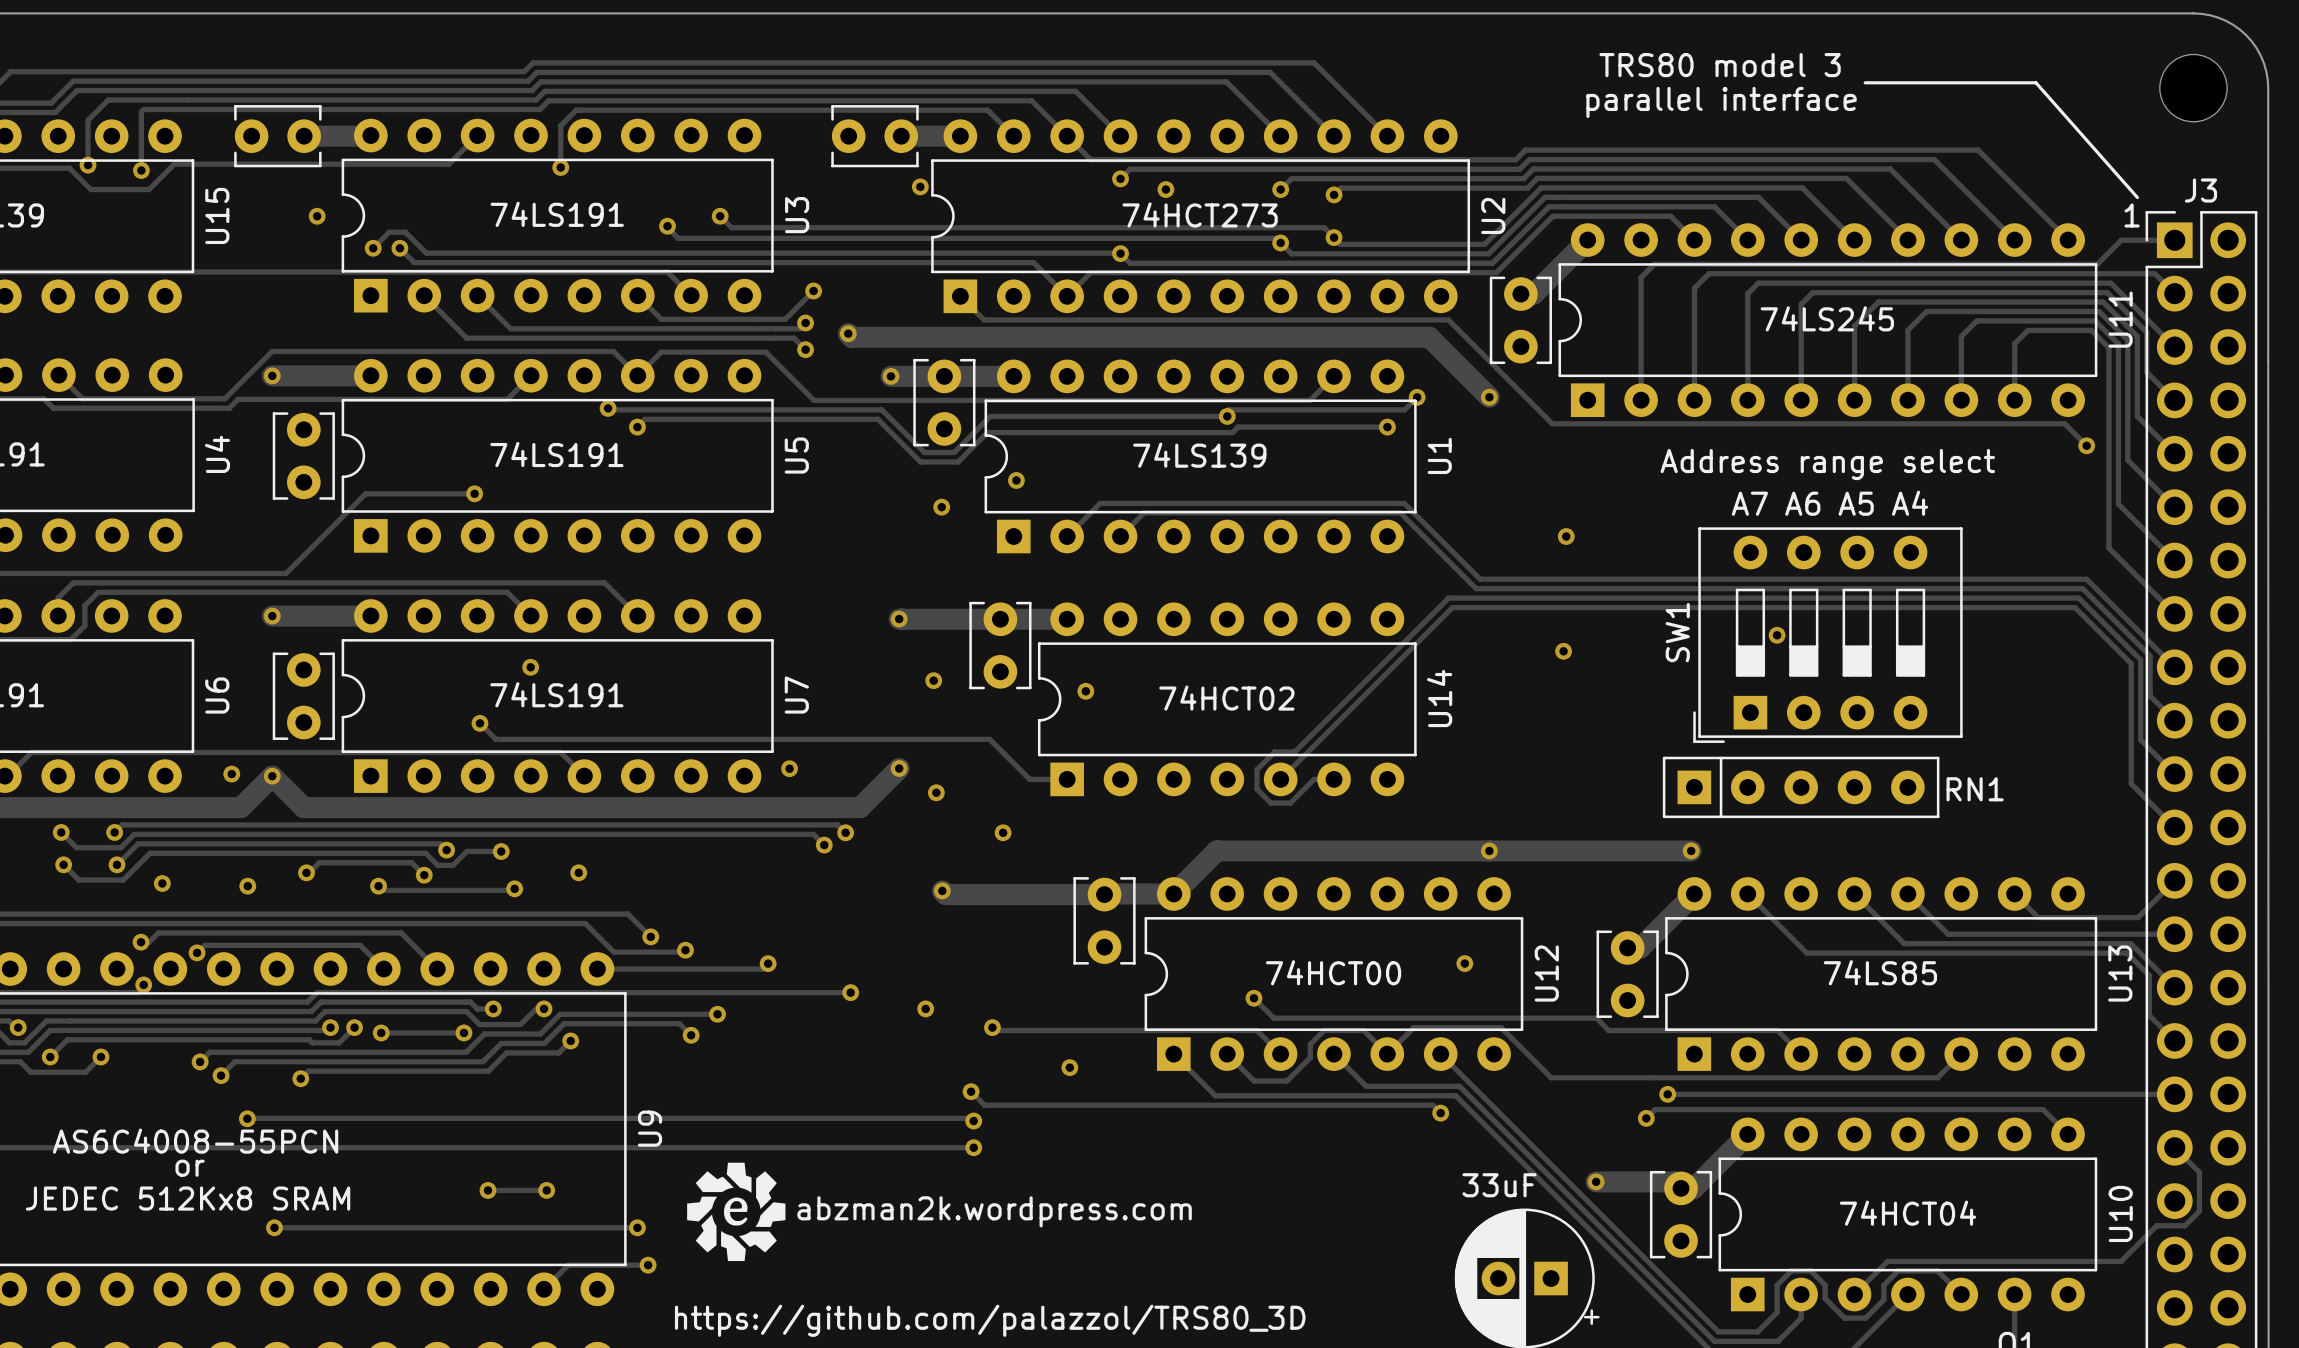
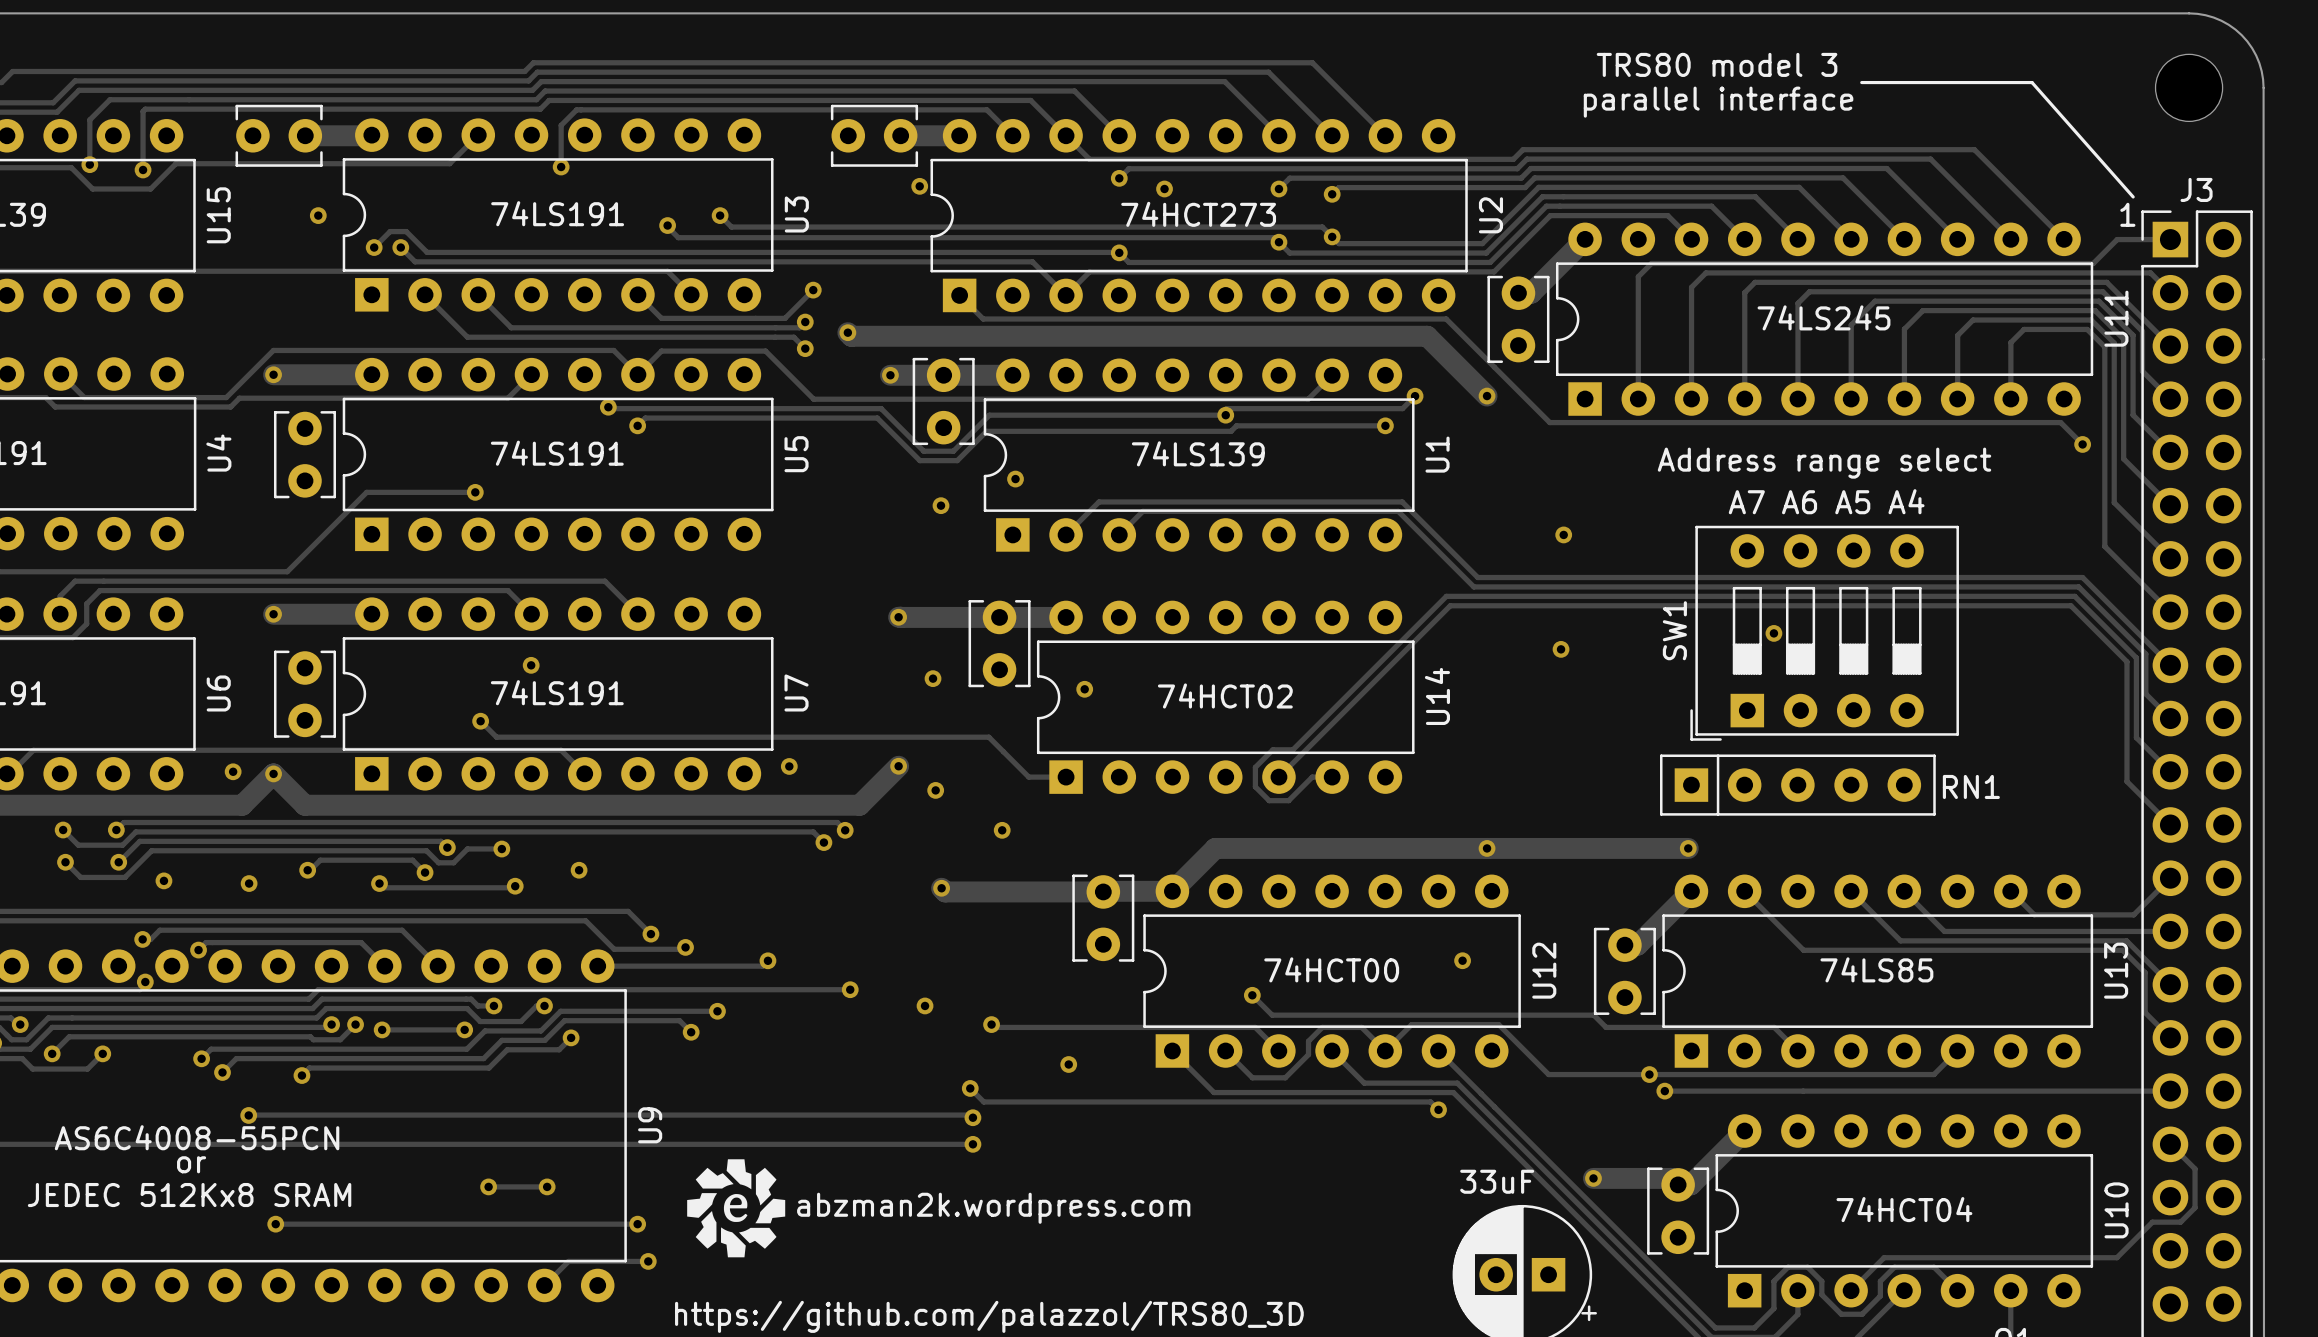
track: (1646, 1118) (1655, 1109) (2043, 1109) (2068, 1134) -> none
via position: (1646, 1118) -> (1649, 1074)

